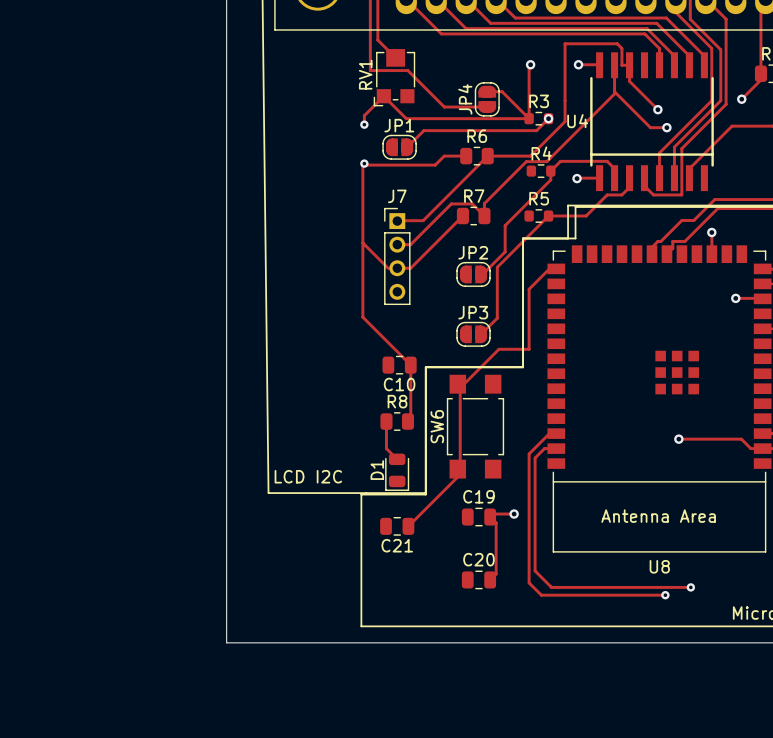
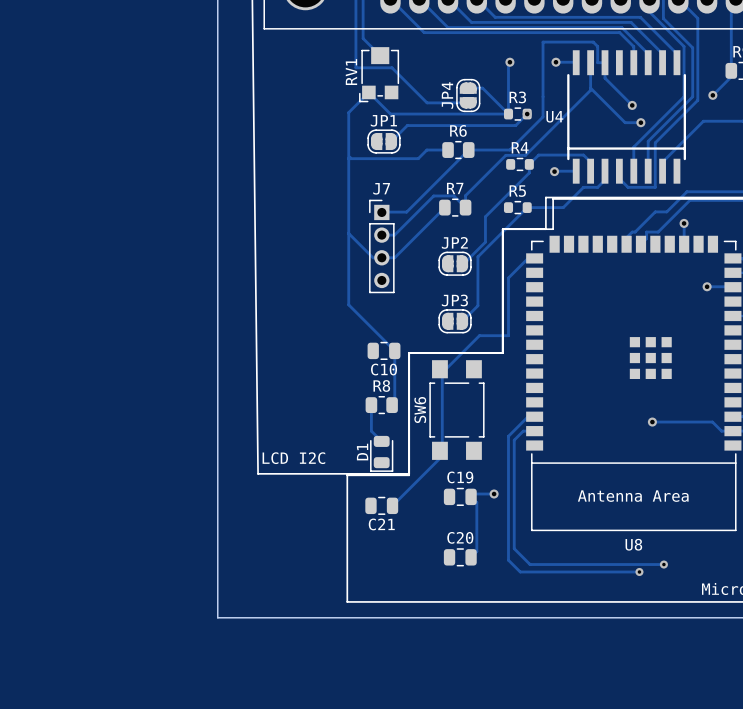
track: (364, 115) (364, 124) -> (350, 111) (348, 158)
via: (364, 124) -> none
via: (364, 163) -> none

